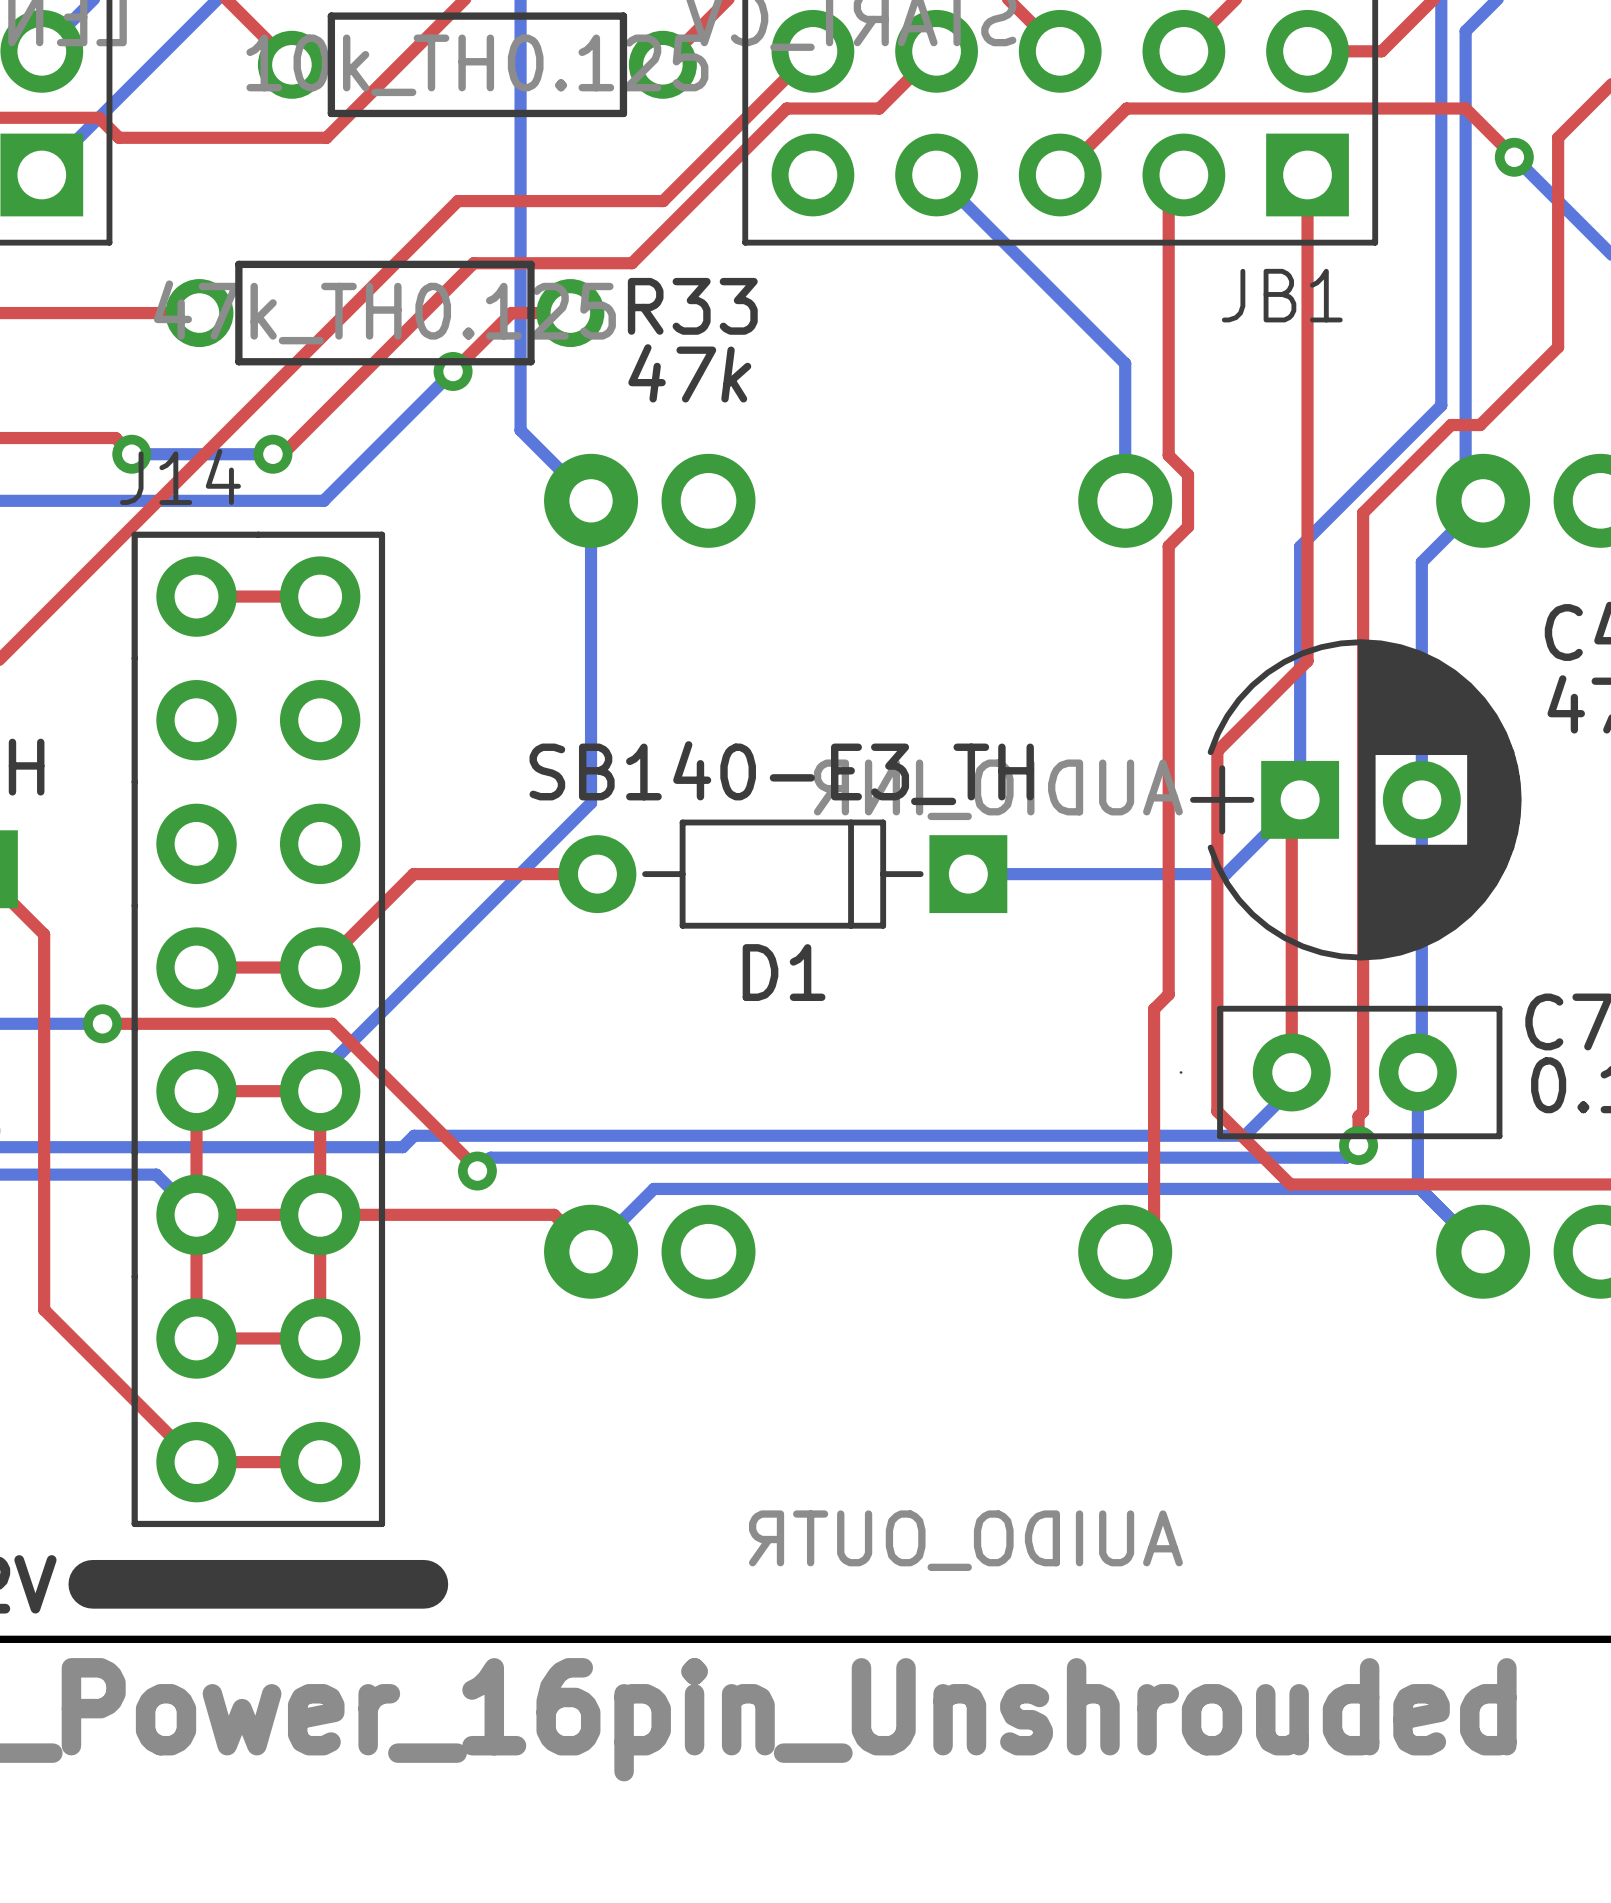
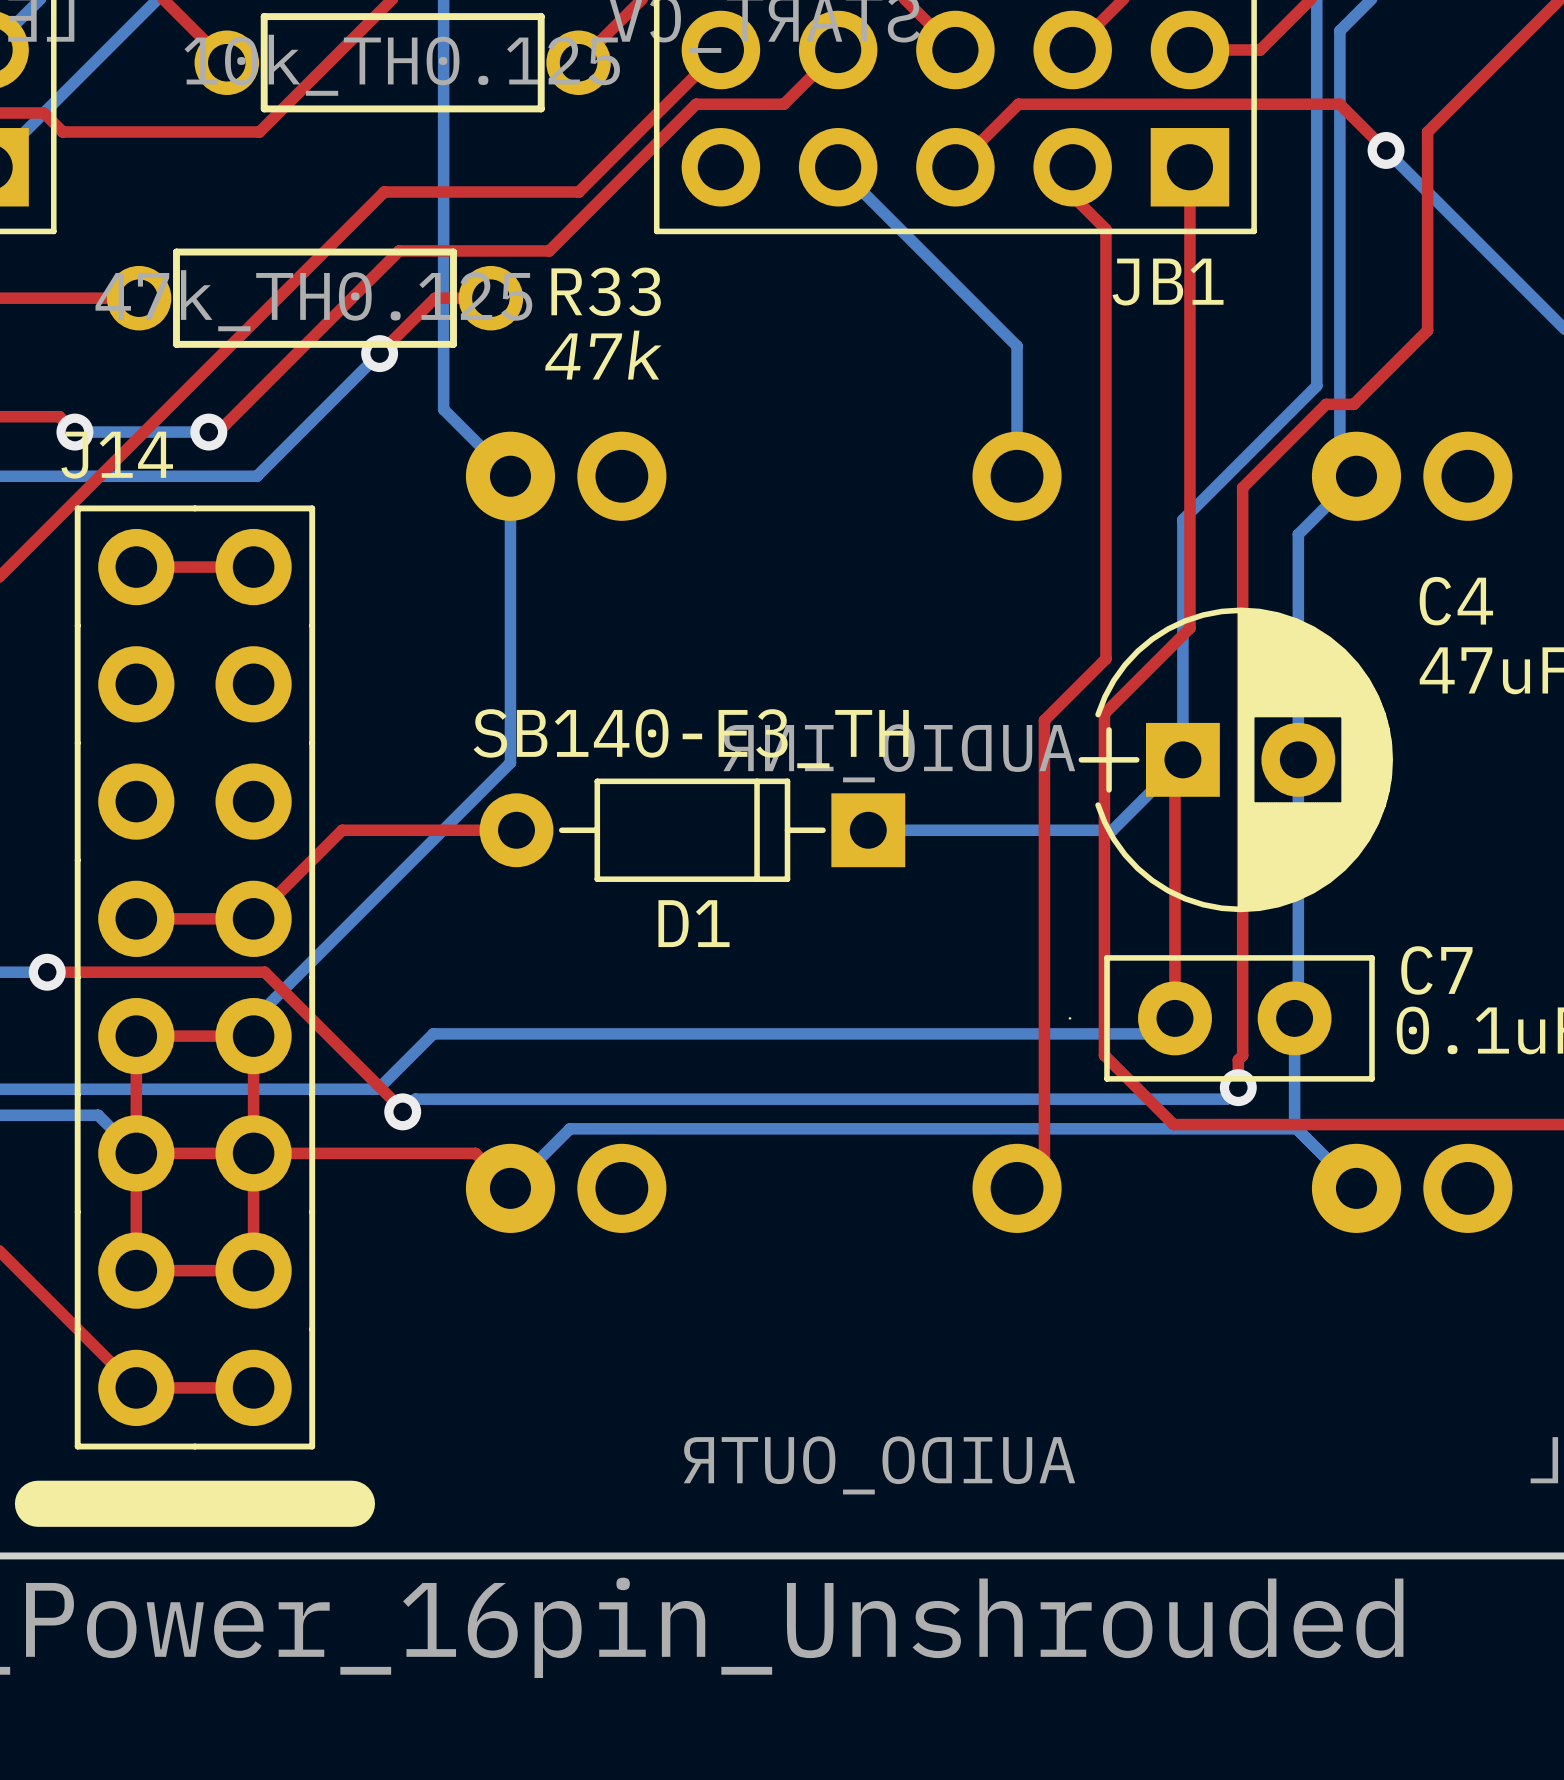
top track: (1168, 190) (1168, 455) (1188, 474) (1188, 526) (1168, 546) (1168, 994) (1154, 1009) -> (1058, 181) (1105, 229) (1105, 658) (1044, 720) (1044, 958)
bottom track: (1291, 1088) (1244, 1135) (414, 1135) (402, 1147) -> (1174, 1033) (433, 1033) (378, 1089) (331, 1089)

